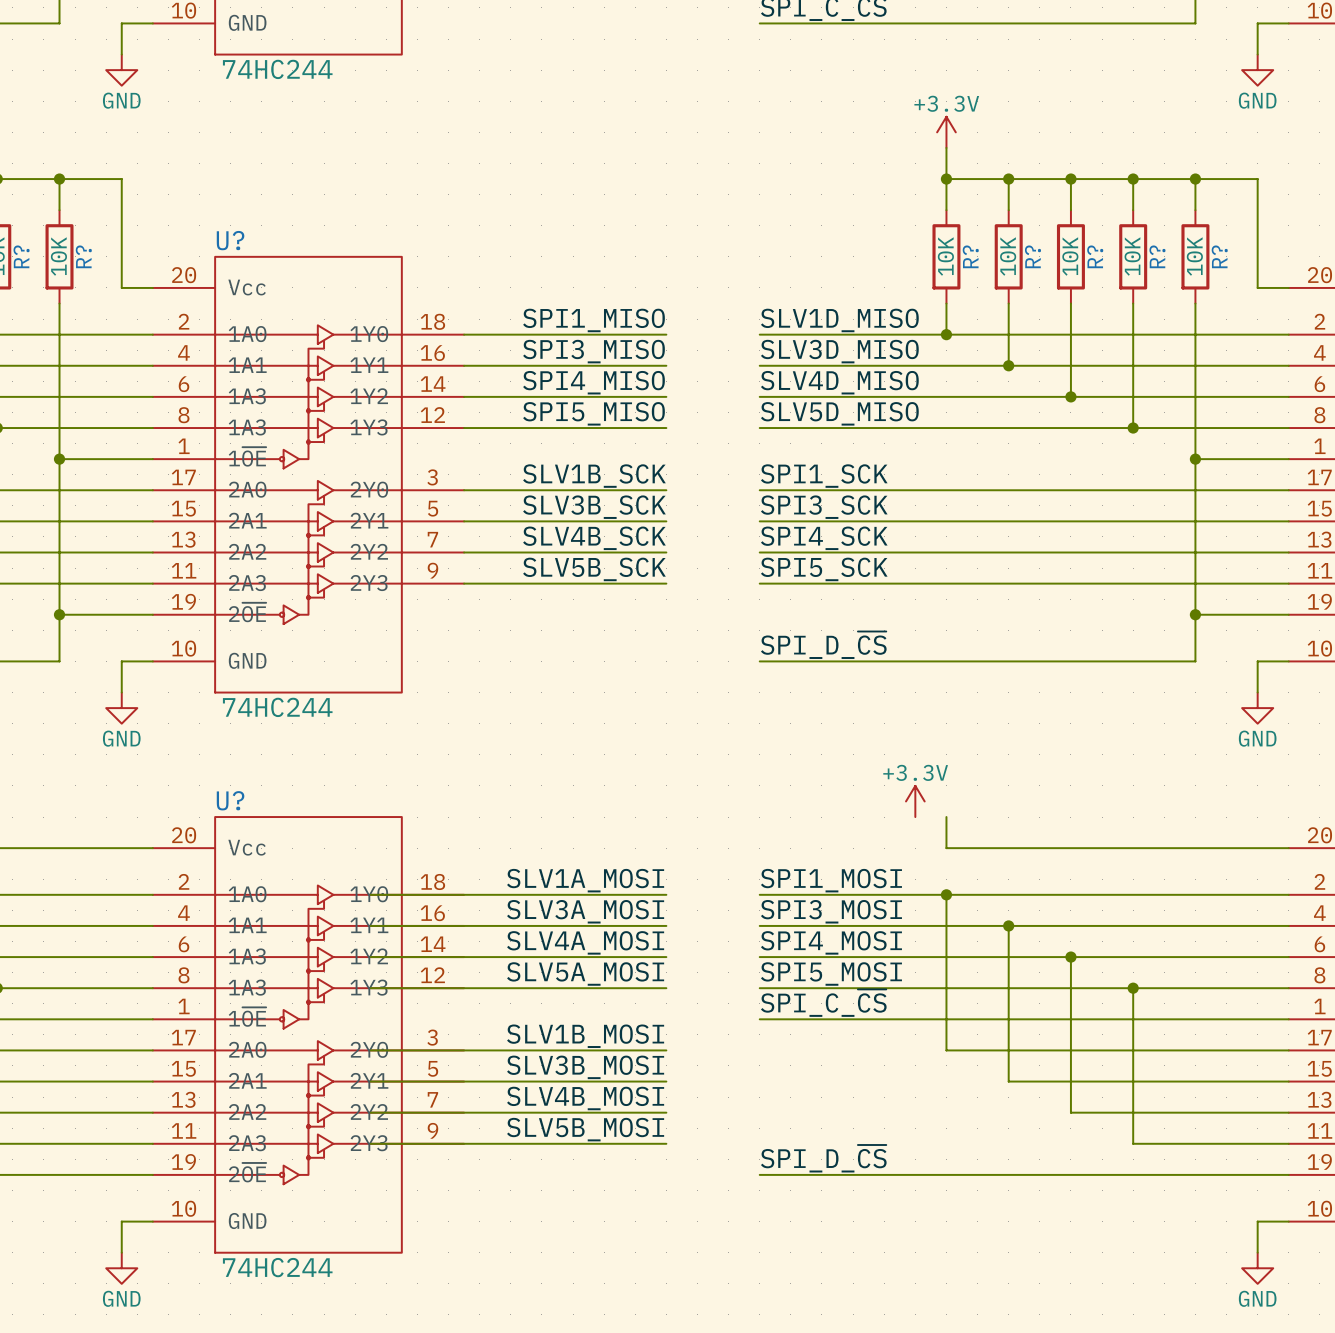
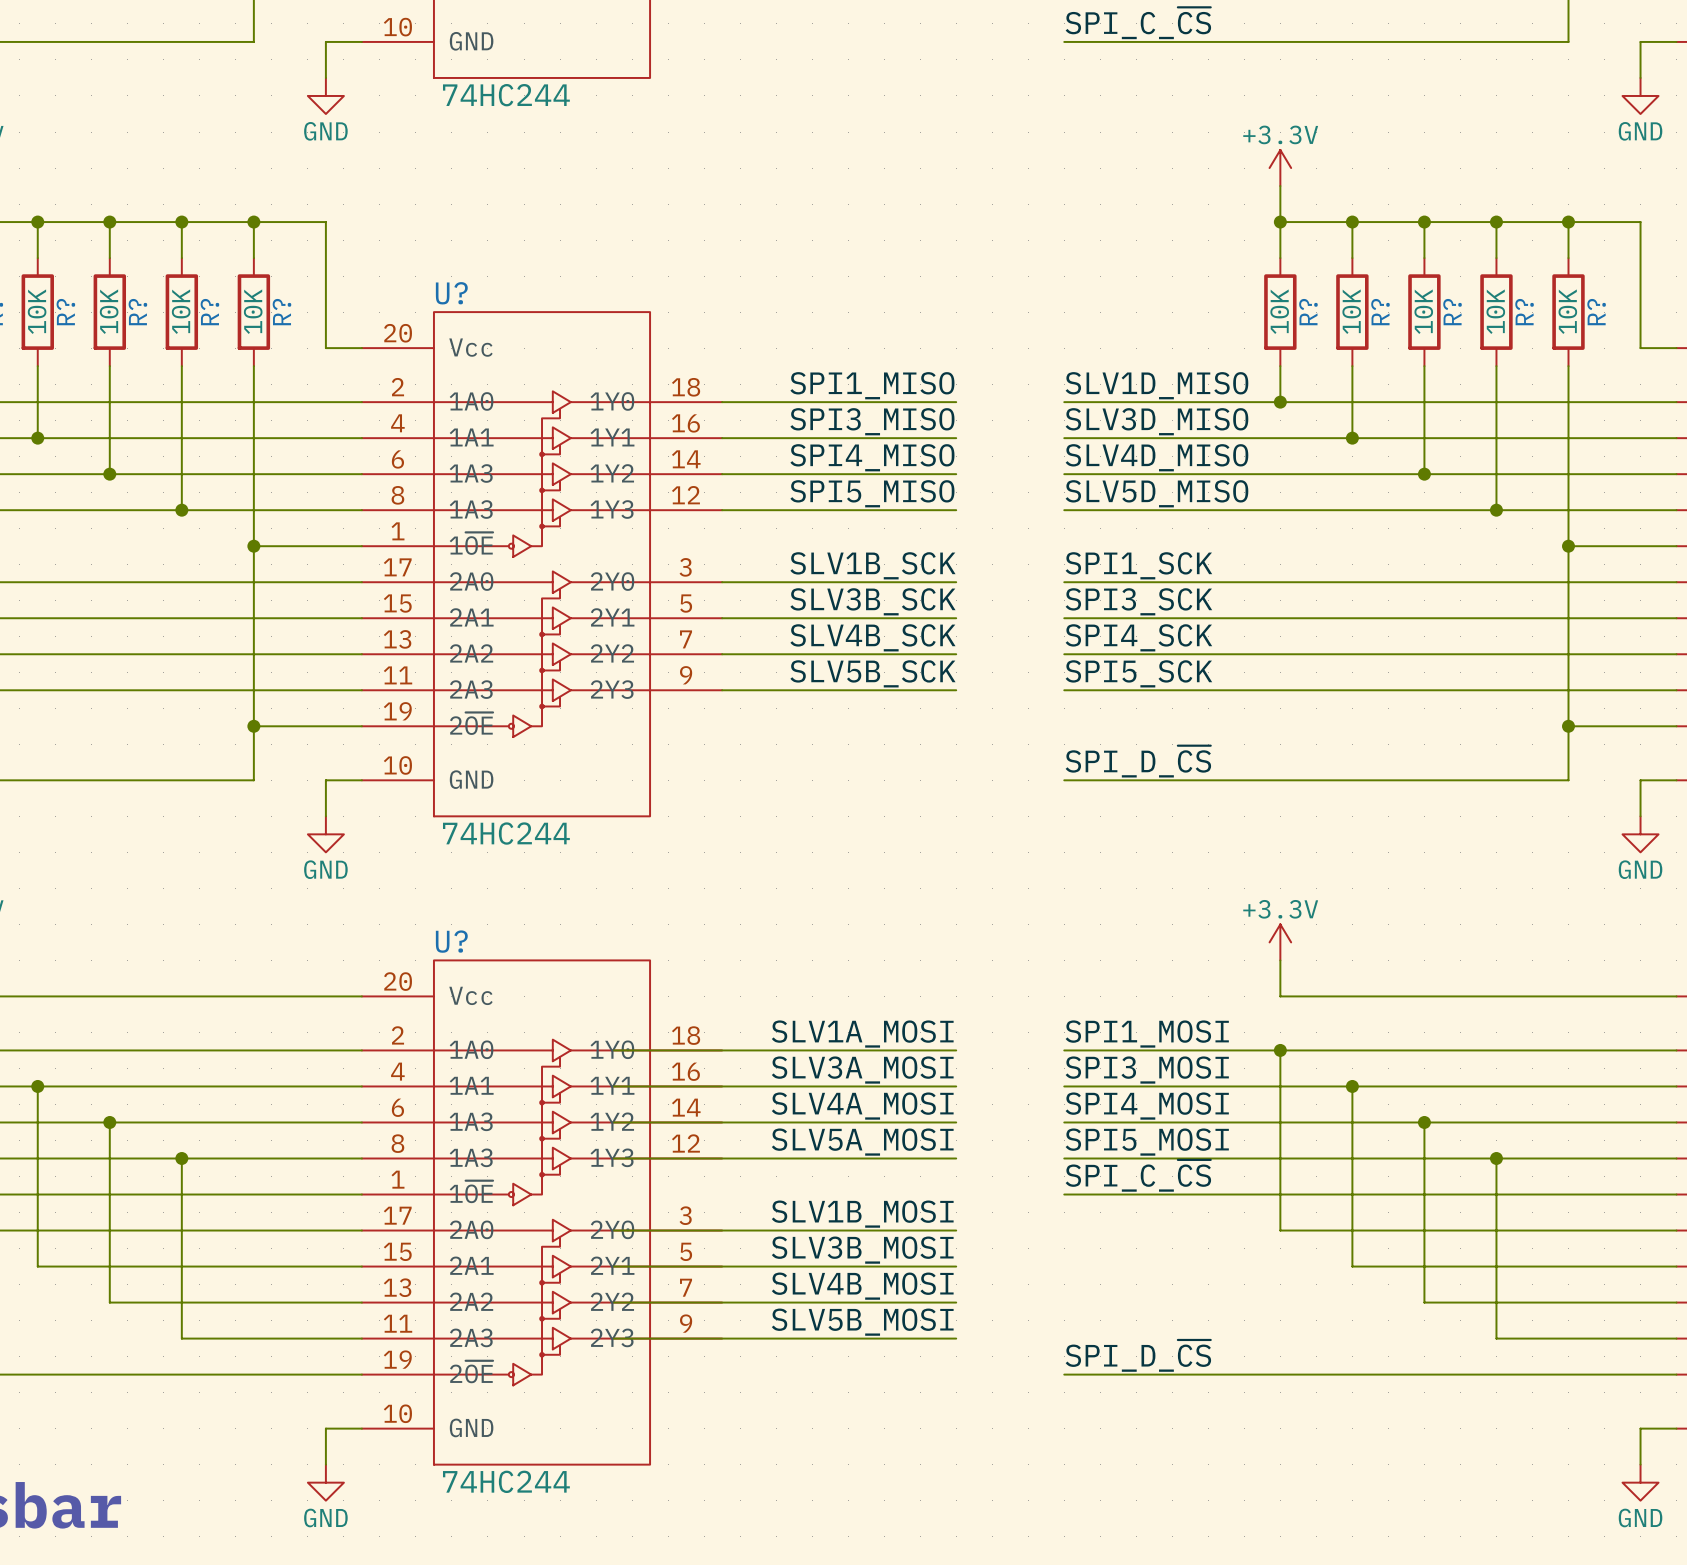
power symbol position: +3.3V (915, 801) -> +3.3V (1280, 942)

